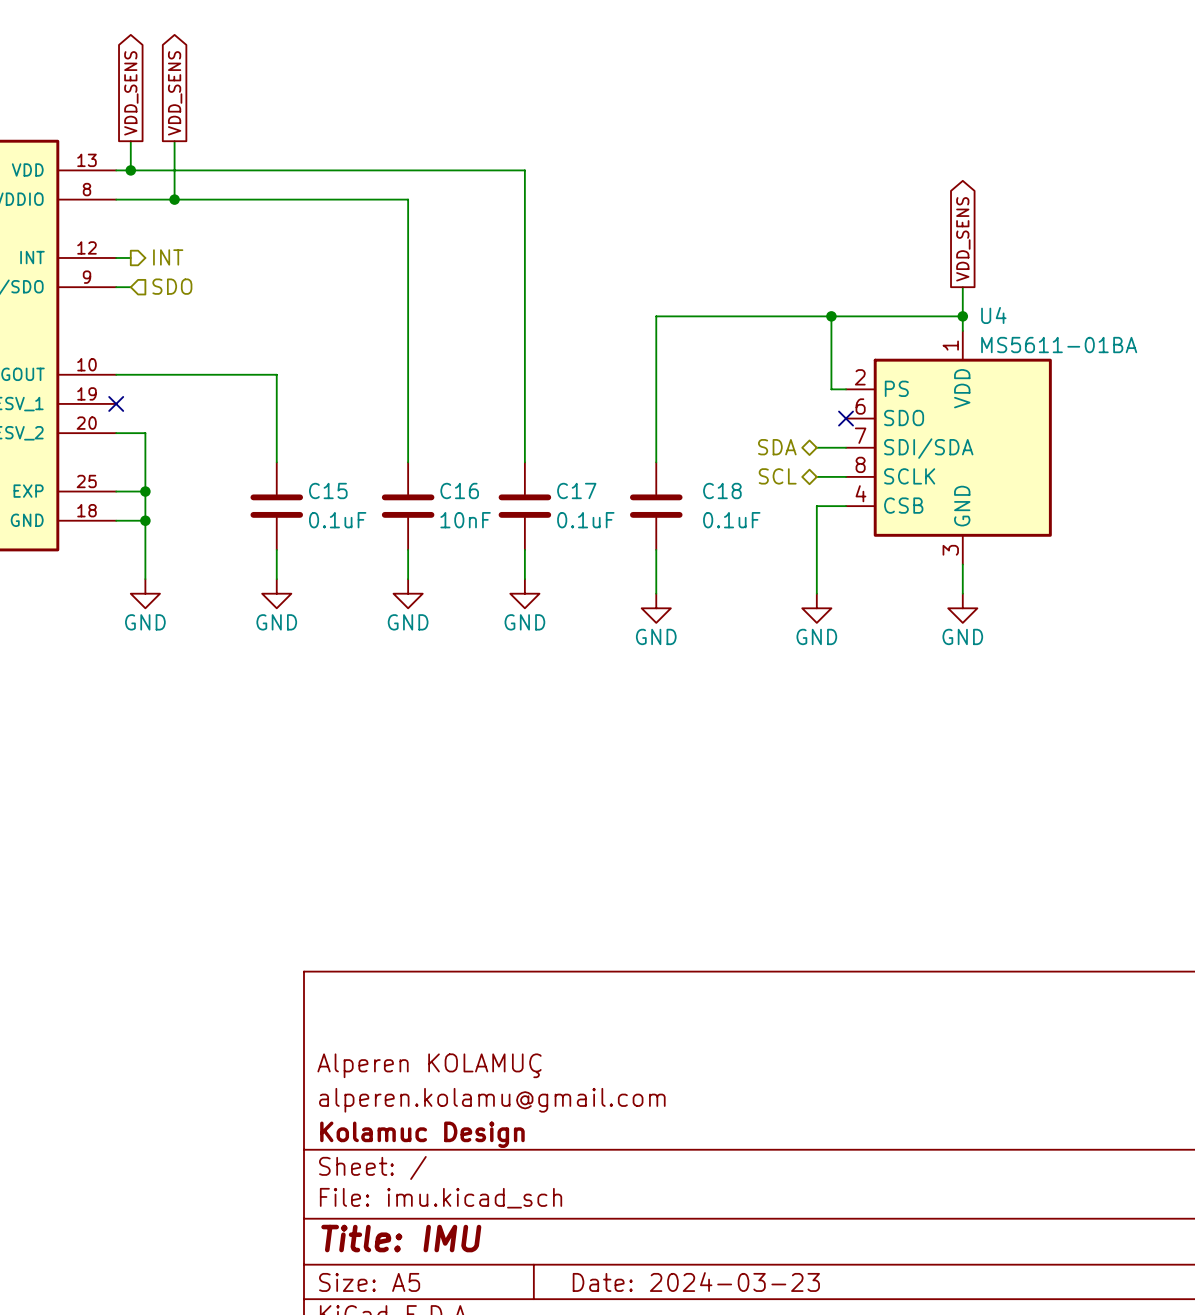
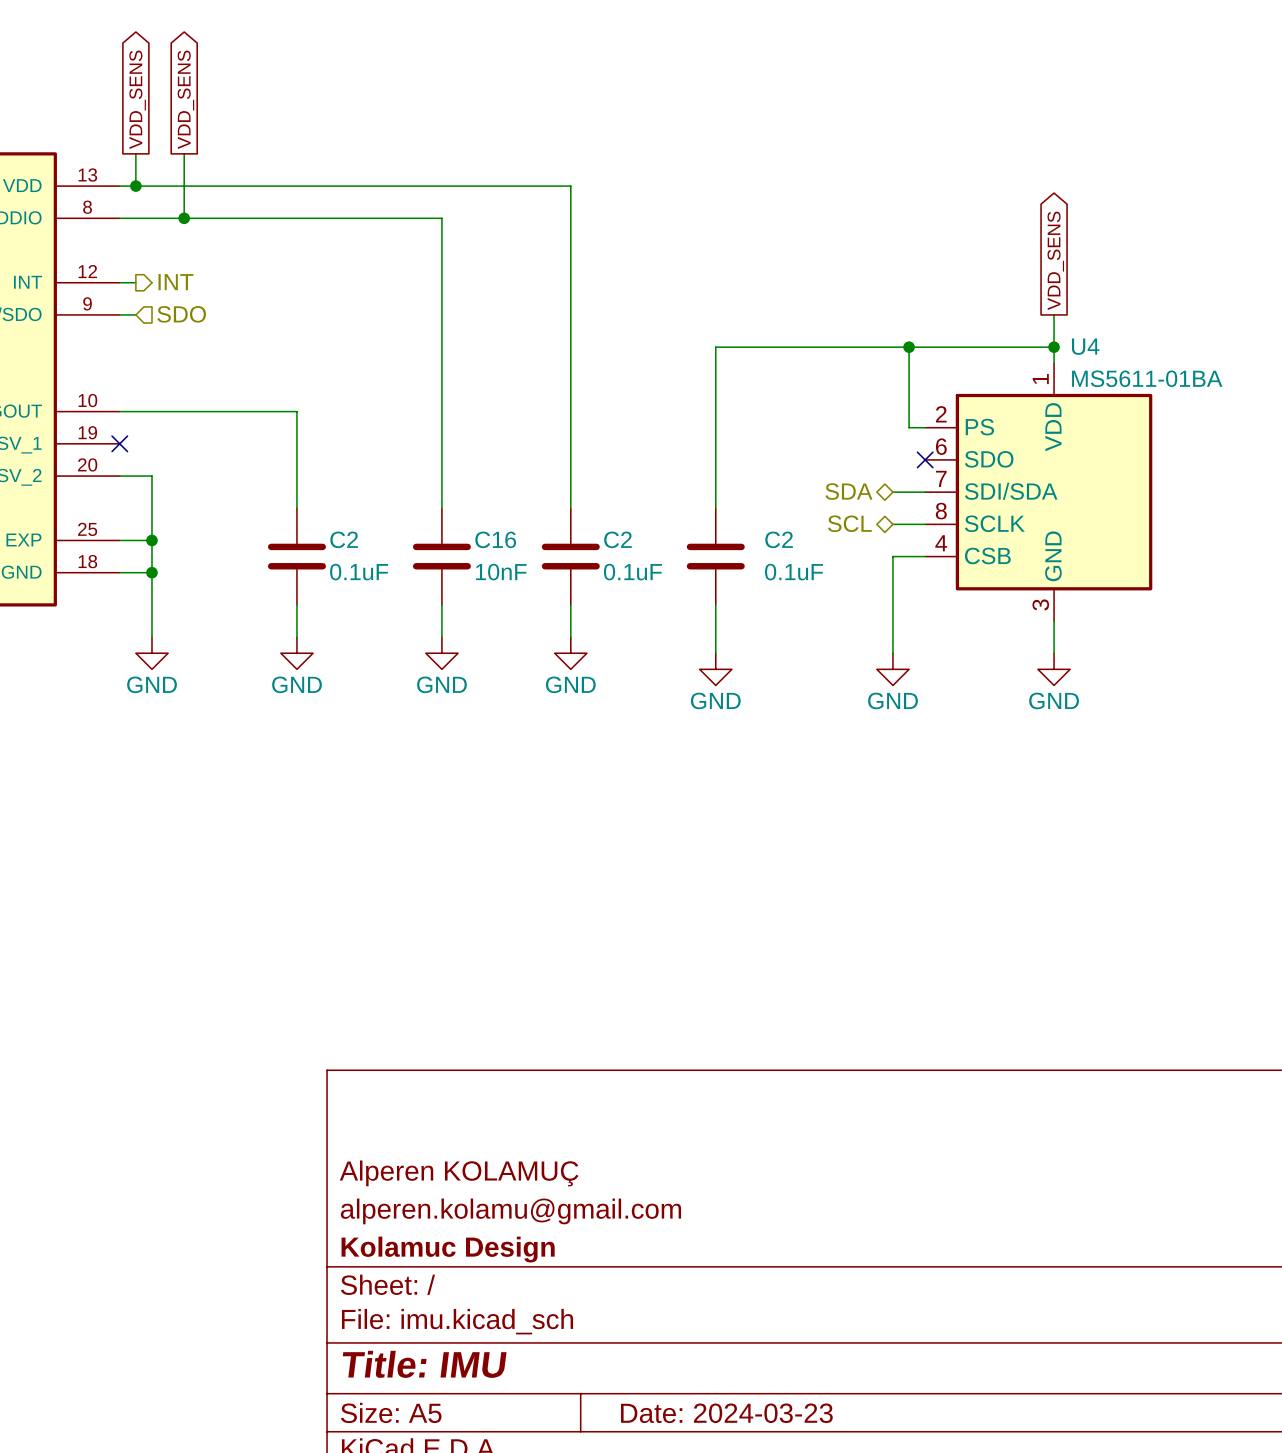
C15 name: C15 (328, 490) -> C2 (344, 539)
C17 name: C17 (576, 490) -> C2 (617, 539)
C18 name: C18 (722, 490) -> C2 (779, 539)

